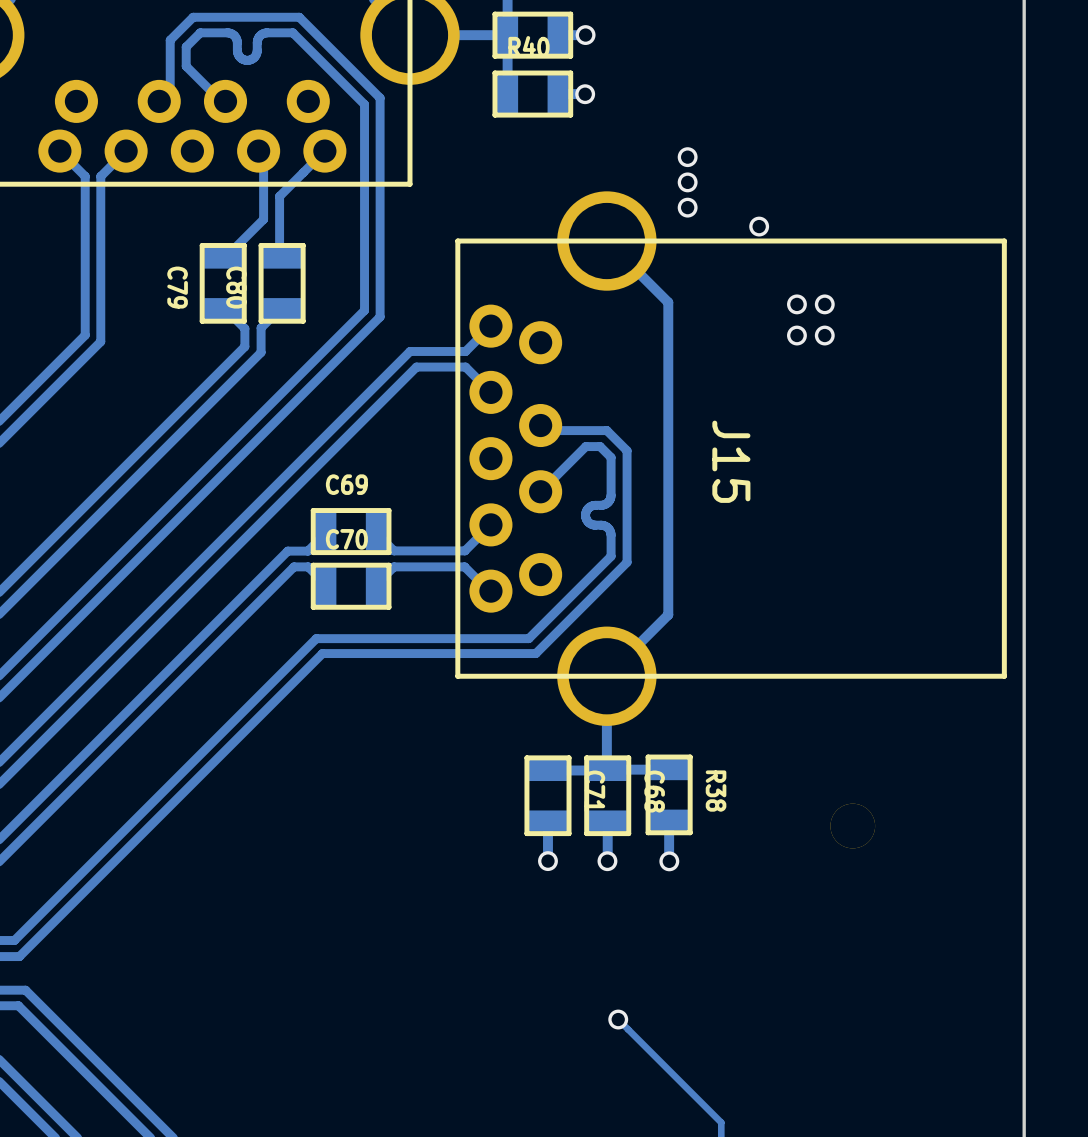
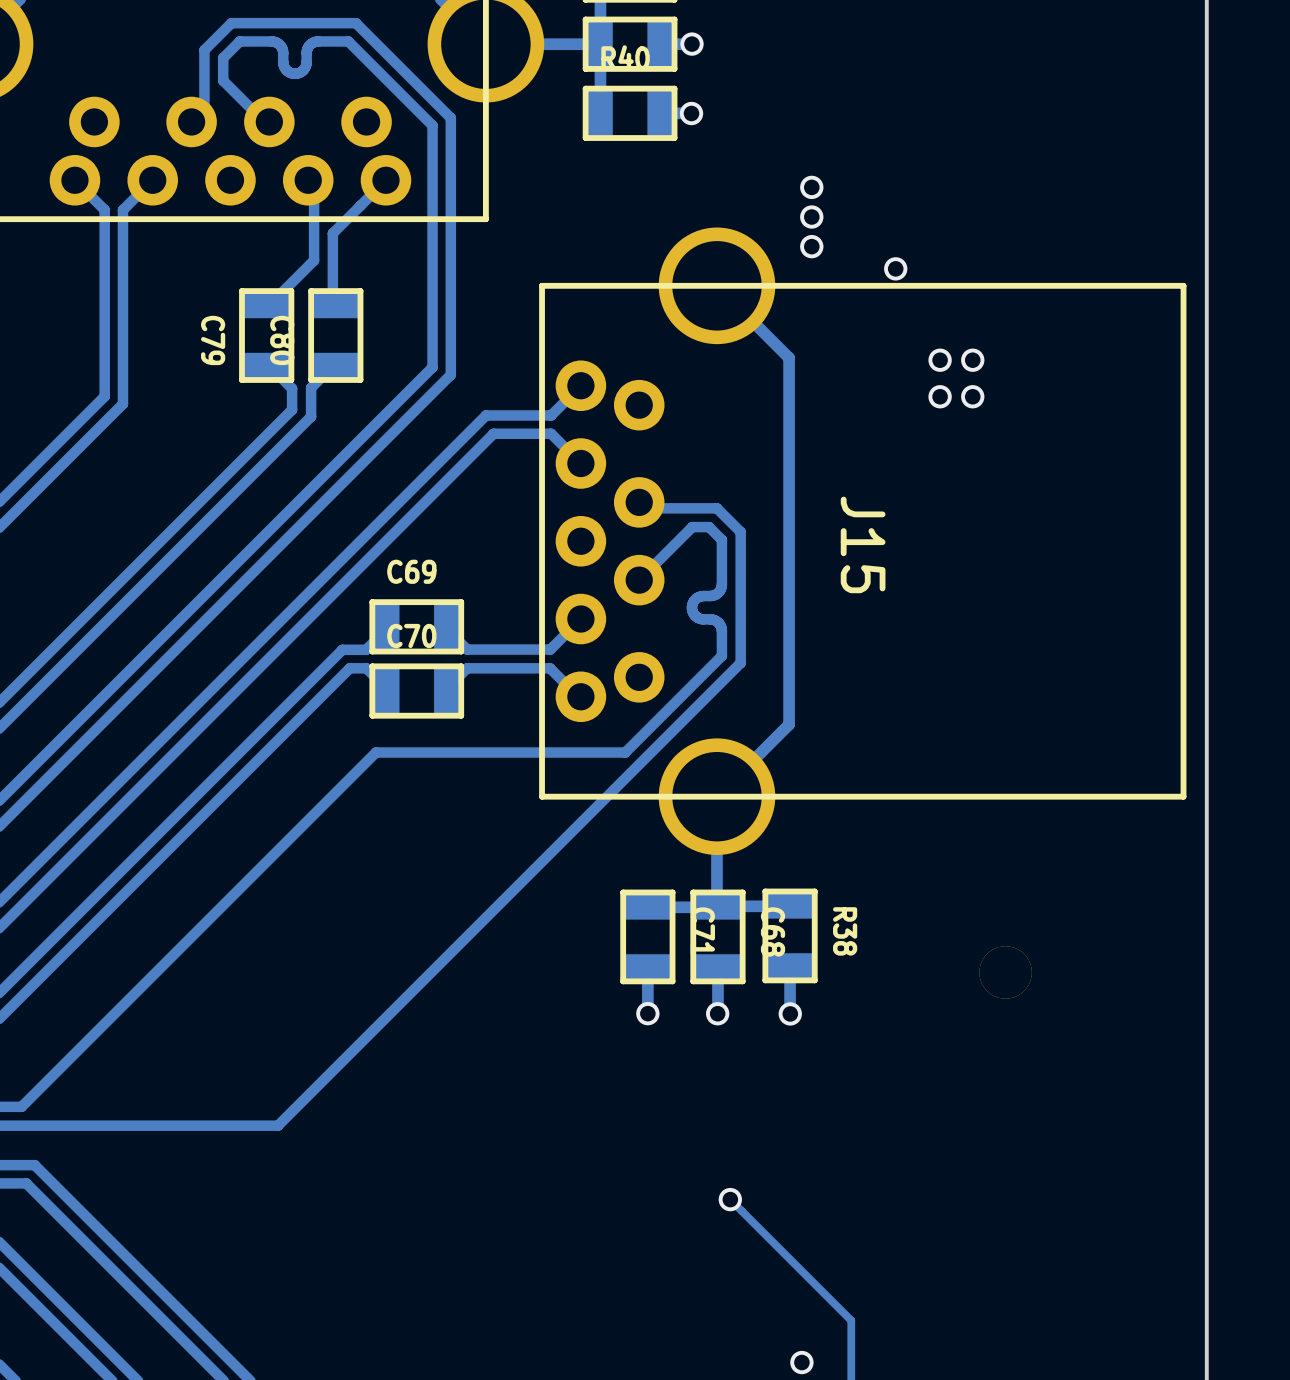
track: (535, 653) (322, 653) (19, 956) -> (633, 770) (278, 1125) (27, 1125)

